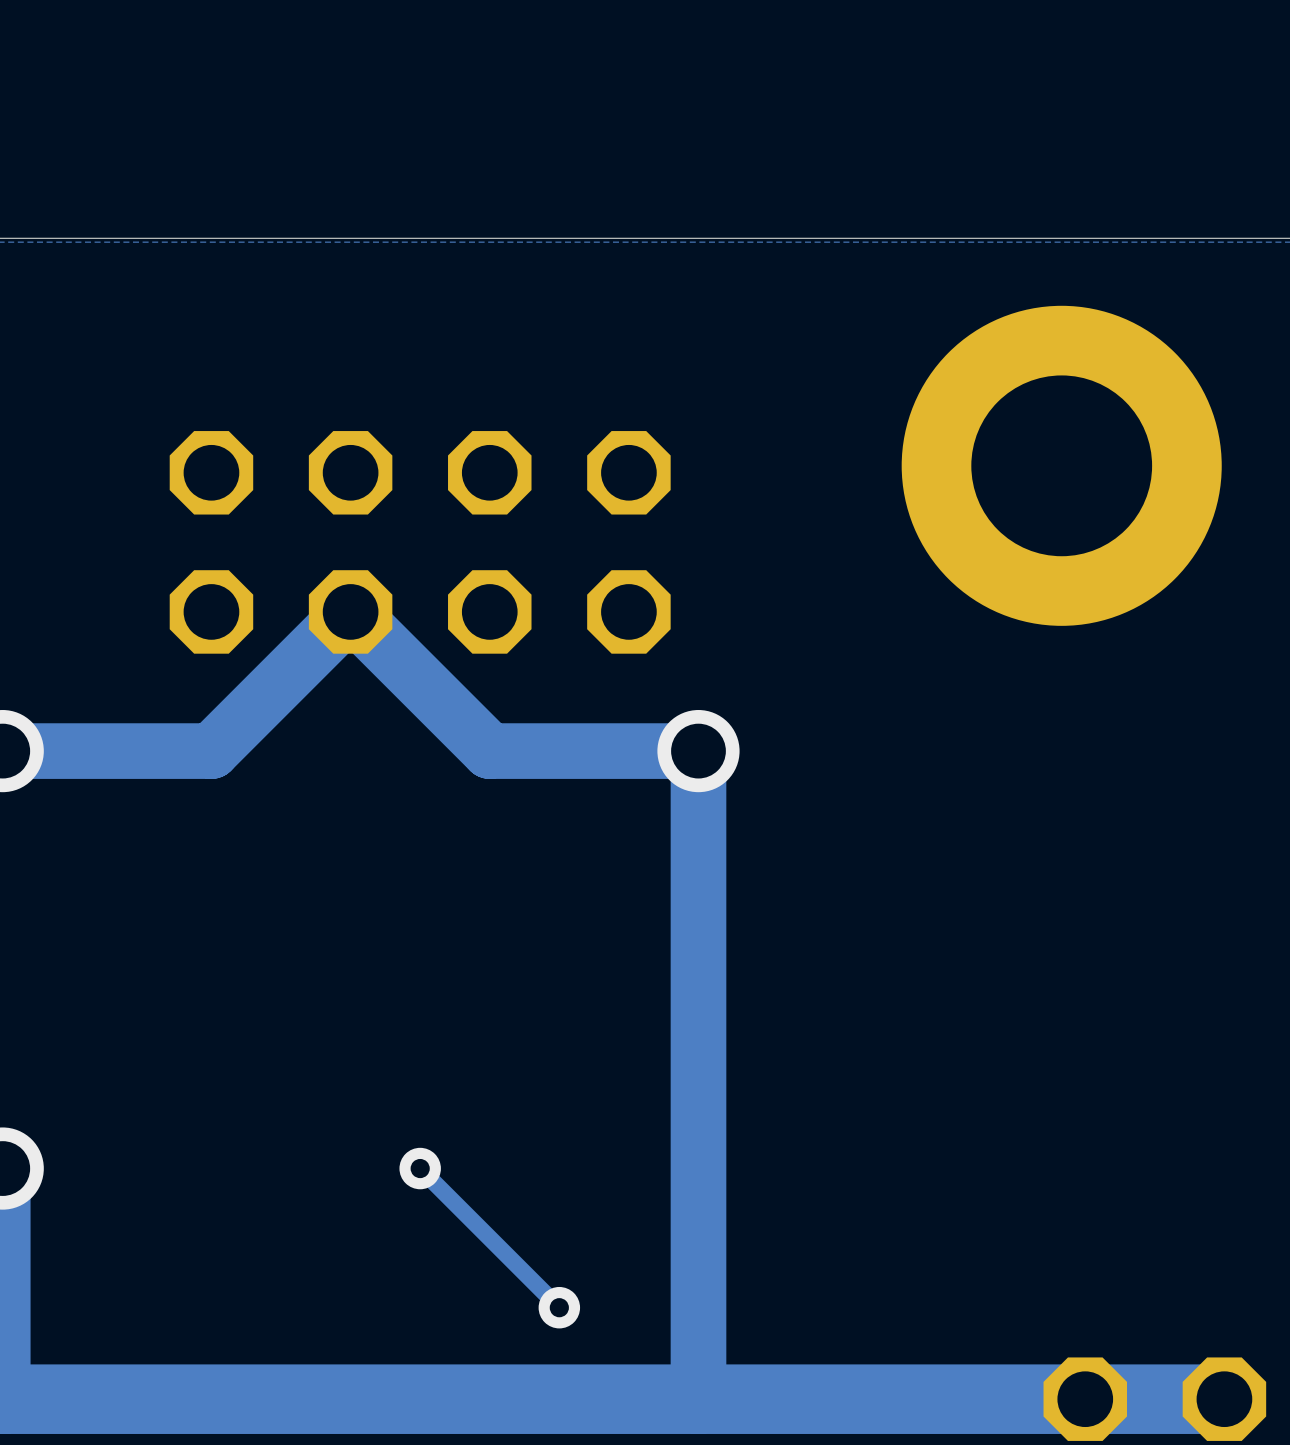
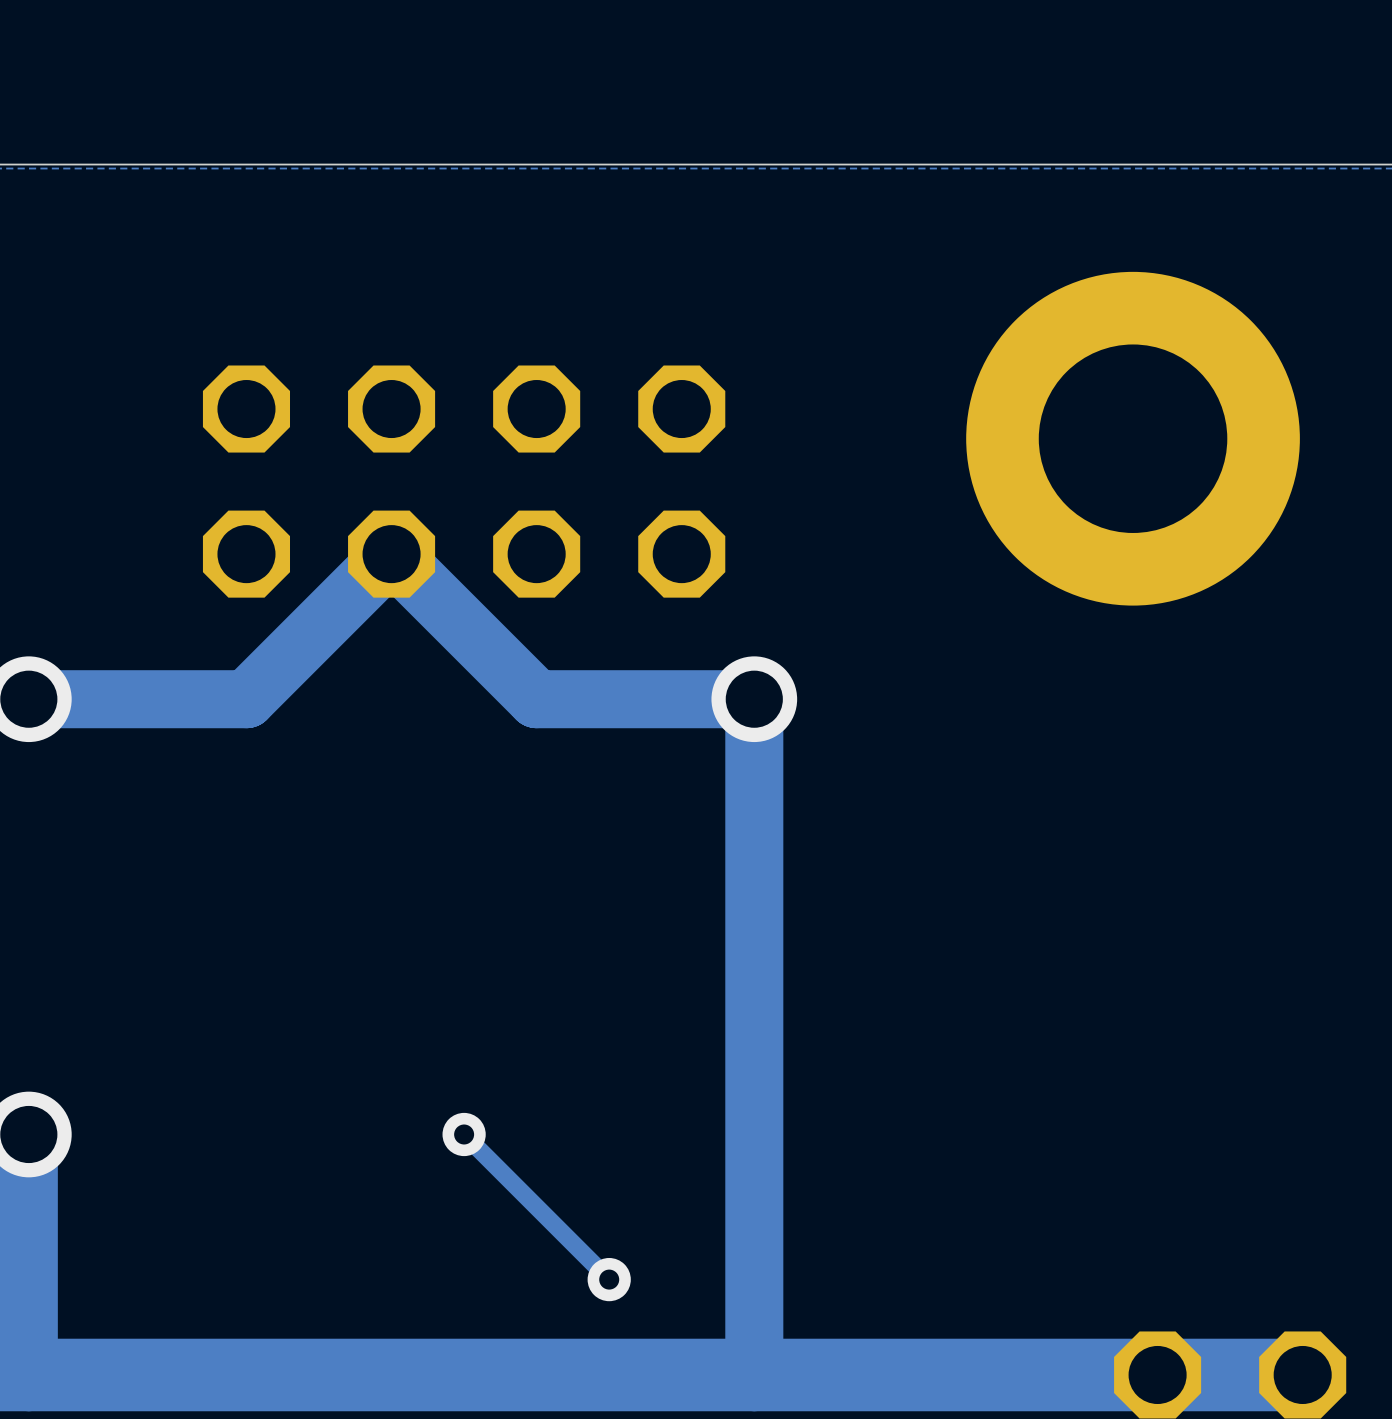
part position: (1061, 465) -> (1133, 438)

